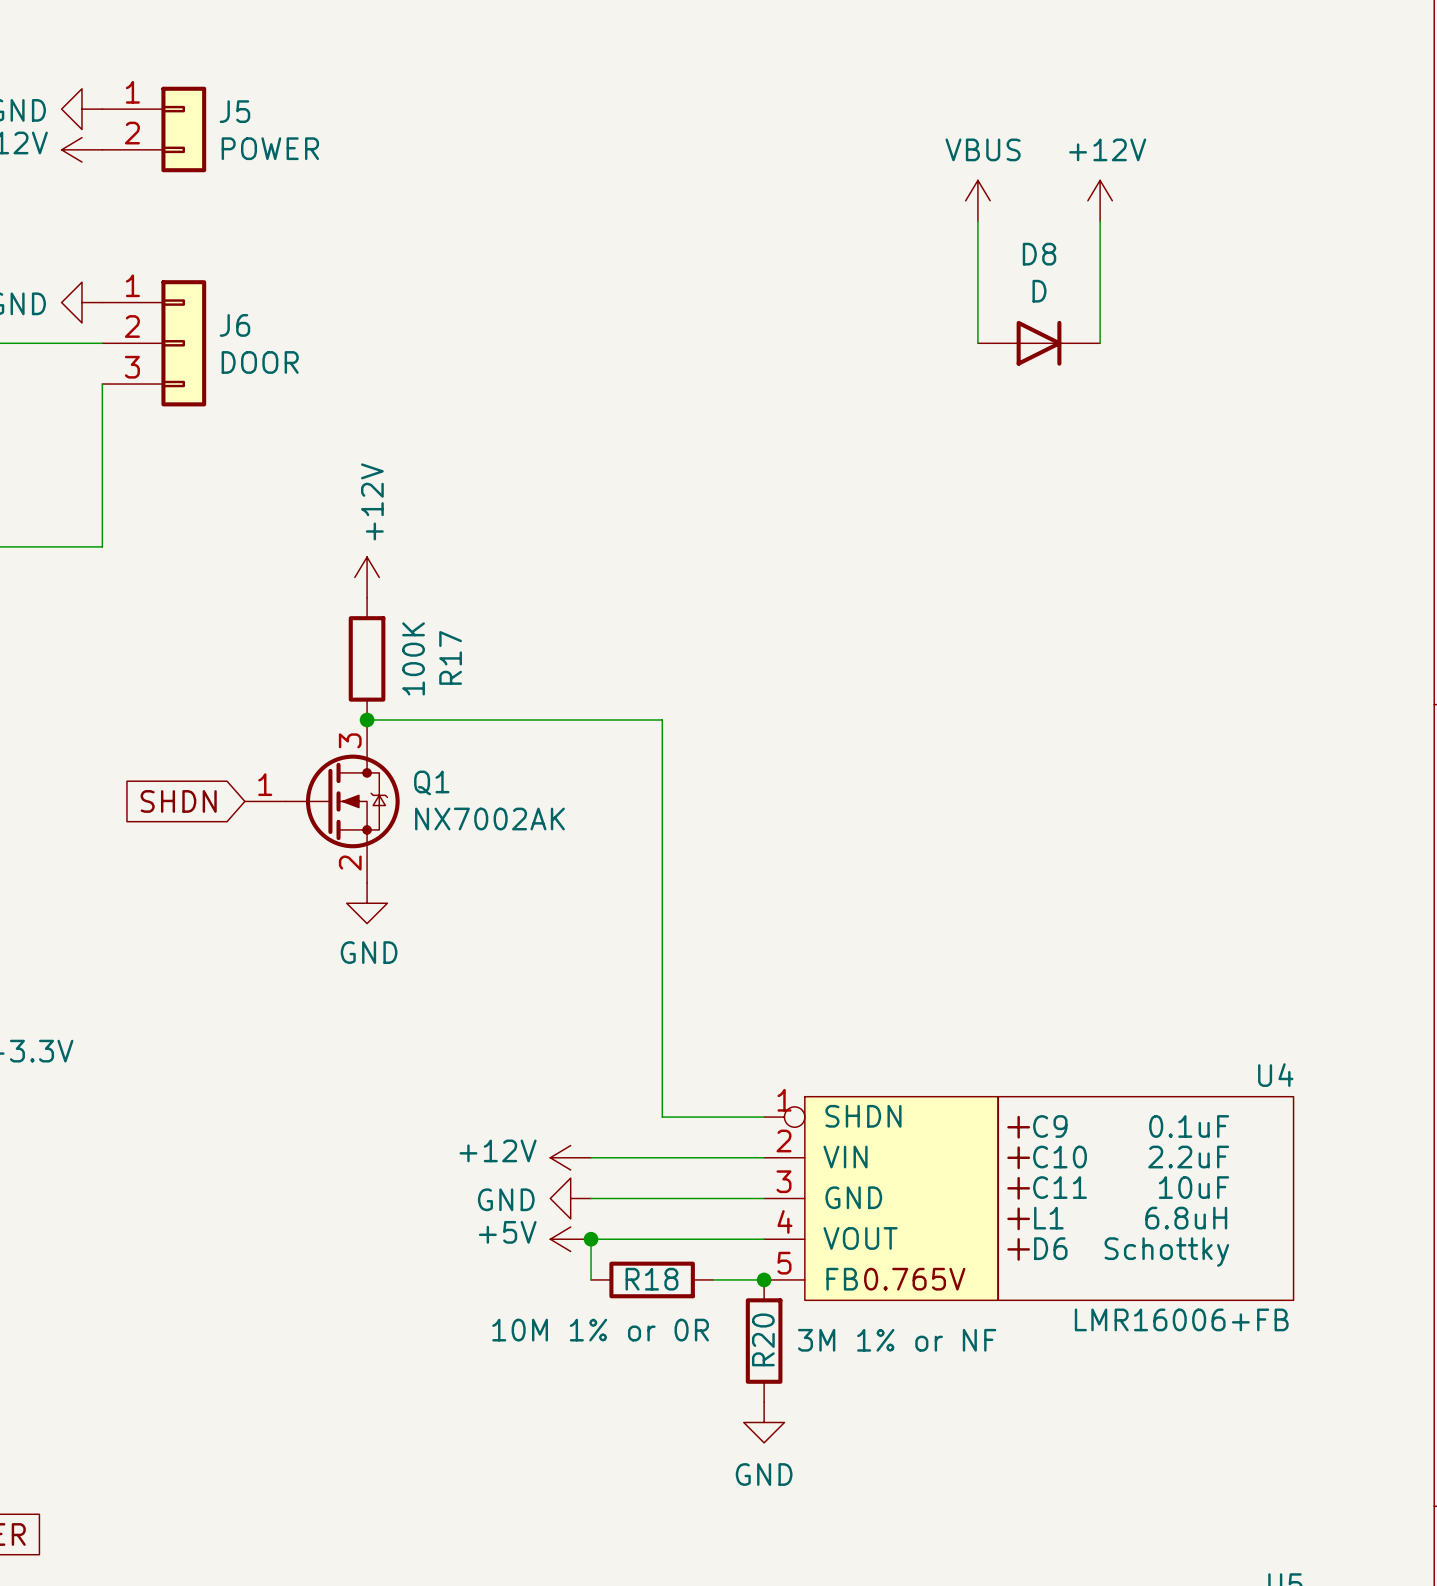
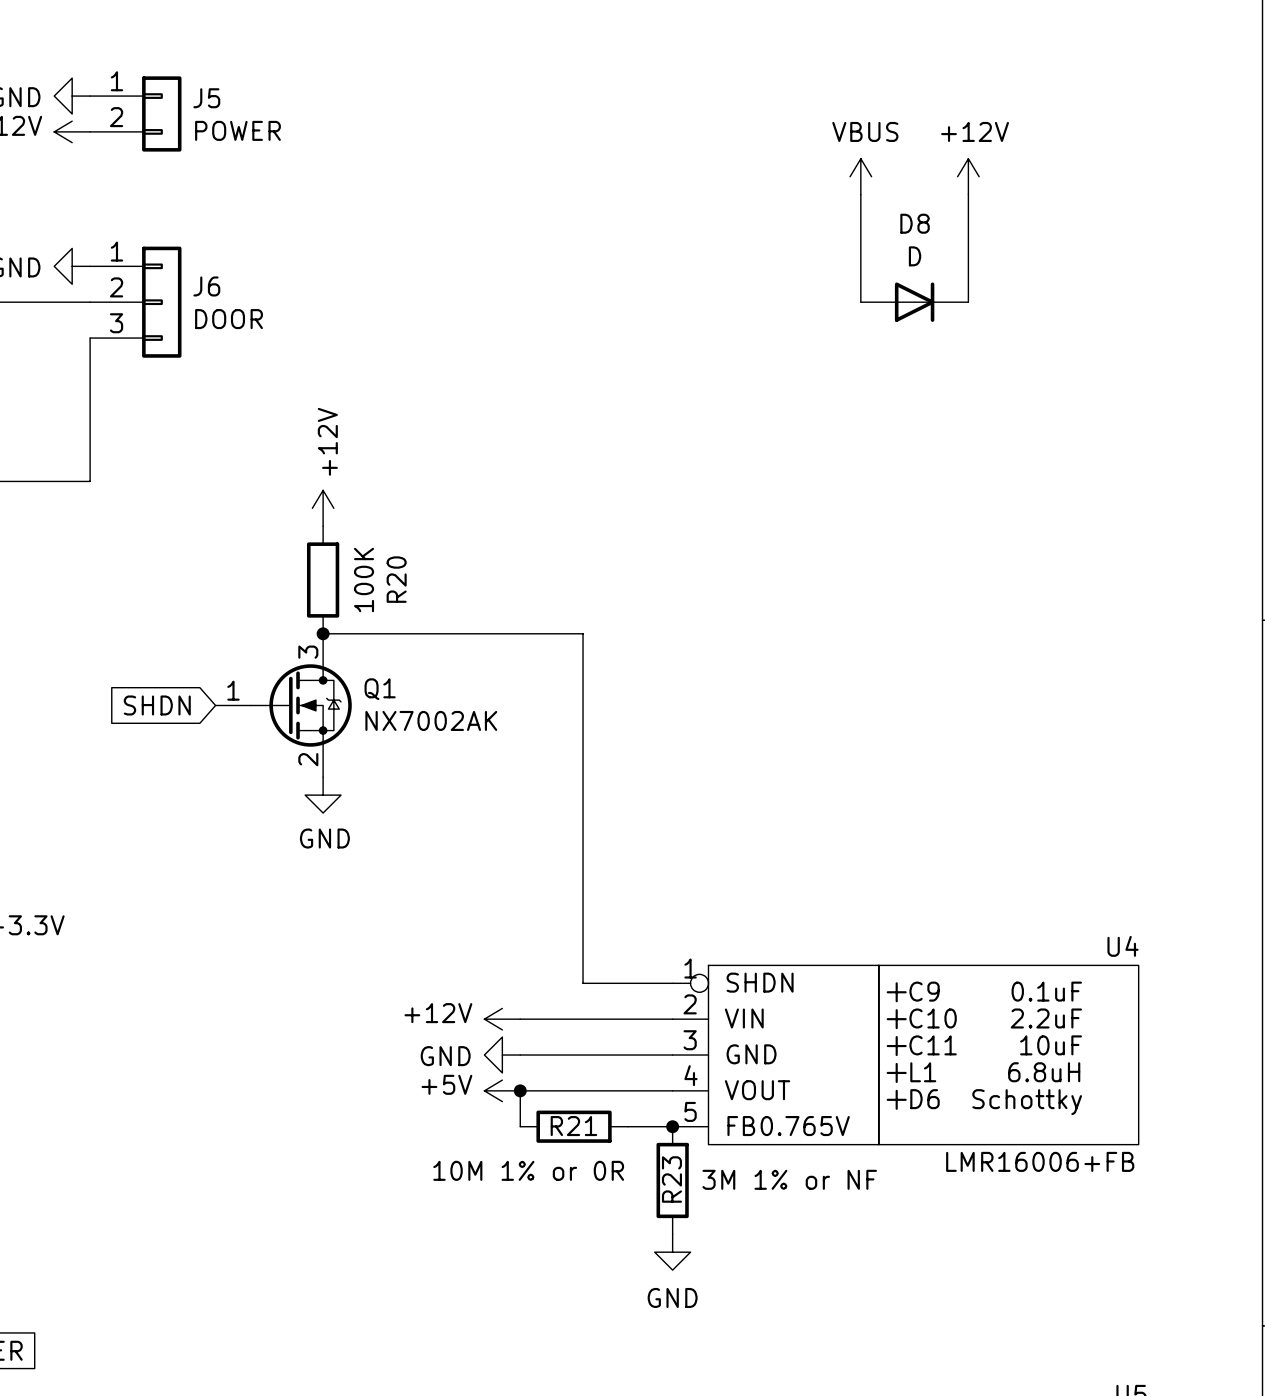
R17 name: R17 (450, 657) -> R20 (396, 579)
R18 name: R18 (651, 1279) -> R21 (573, 1126)
R20 name: R20 (763, 1339) -> R23 (671, 1179)

